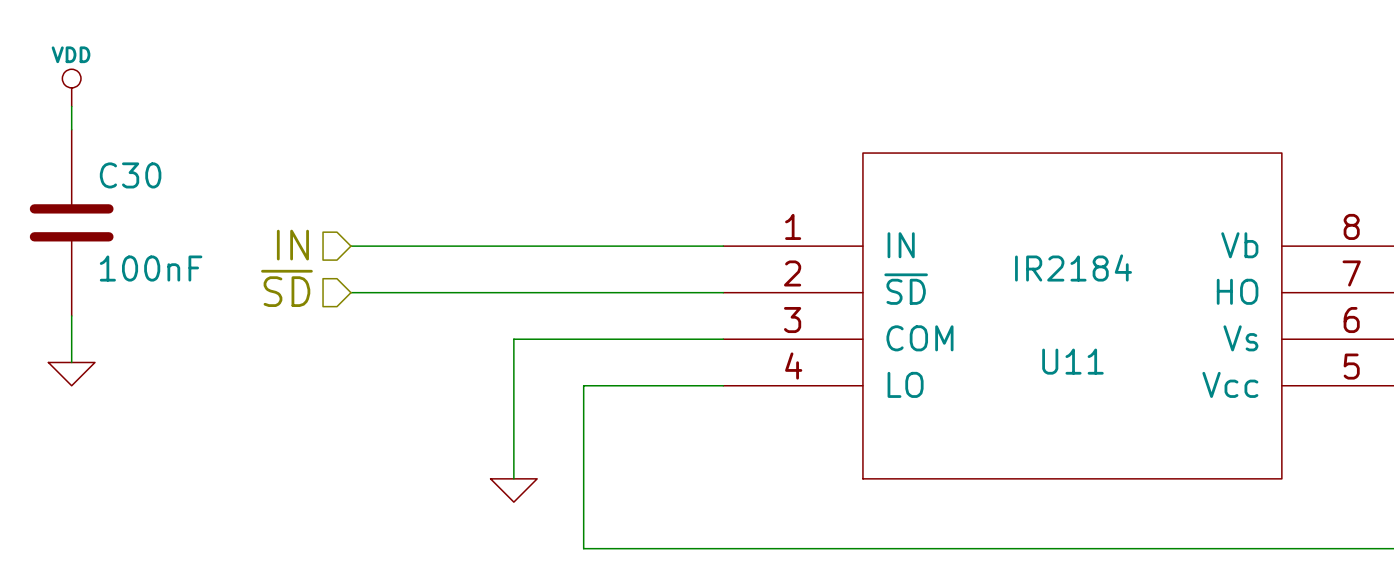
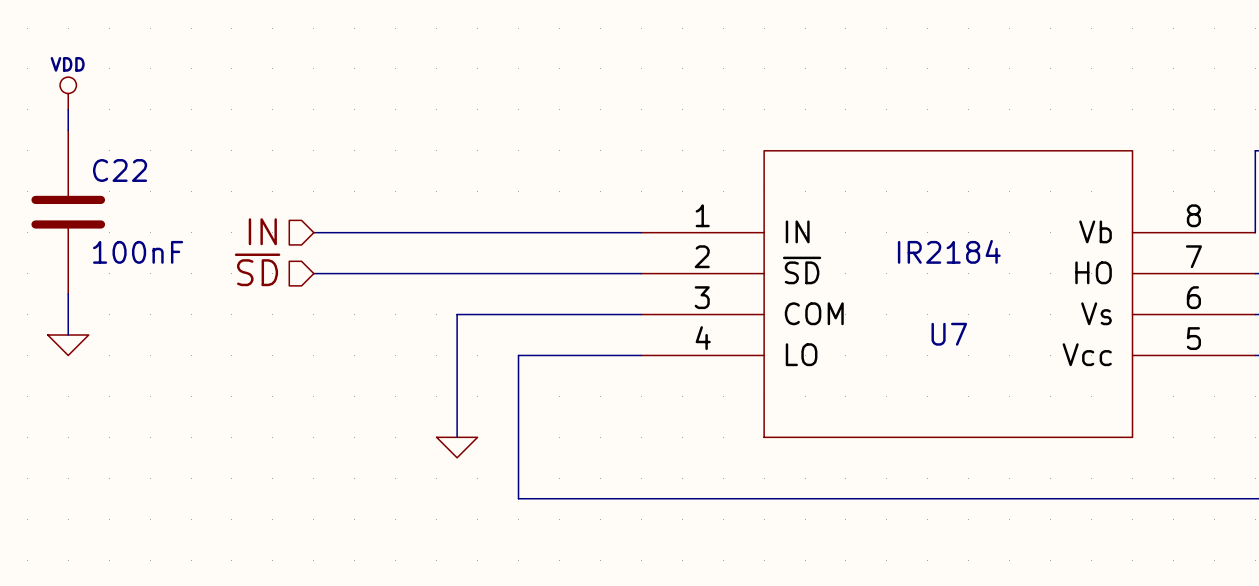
C30 name: C30 (130, 175) -> C22 (120, 170)
U11 name: U11 (1072, 361) -> U7 (949, 334)

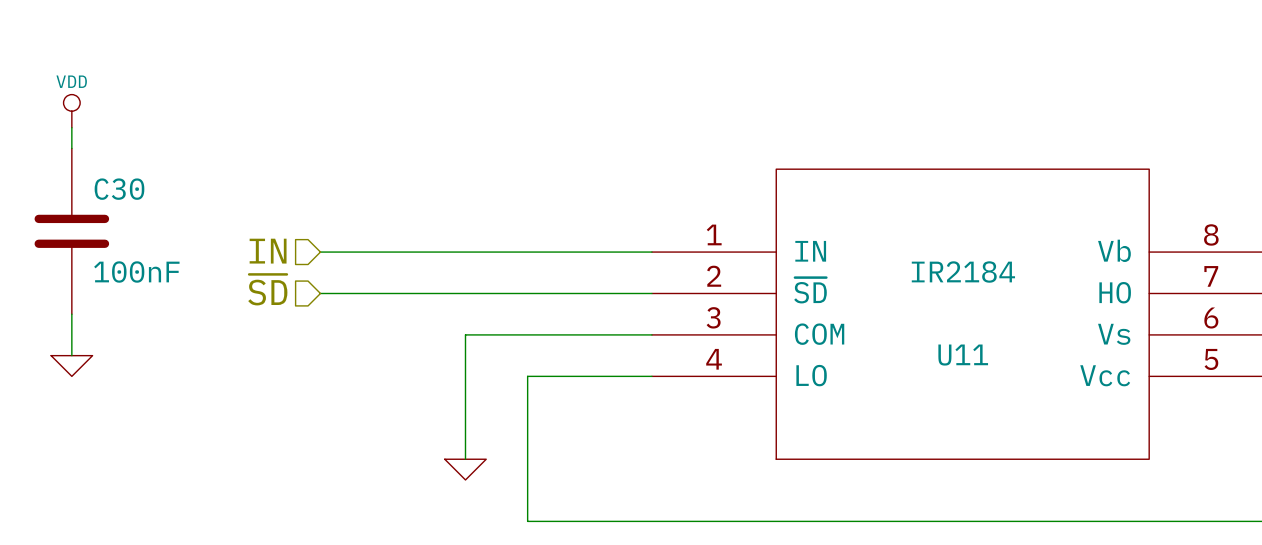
C22 name: C22 (120, 170) -> C30 (119, 189)
U7 name: U7 (949, 334) -> U11 (963, 355)

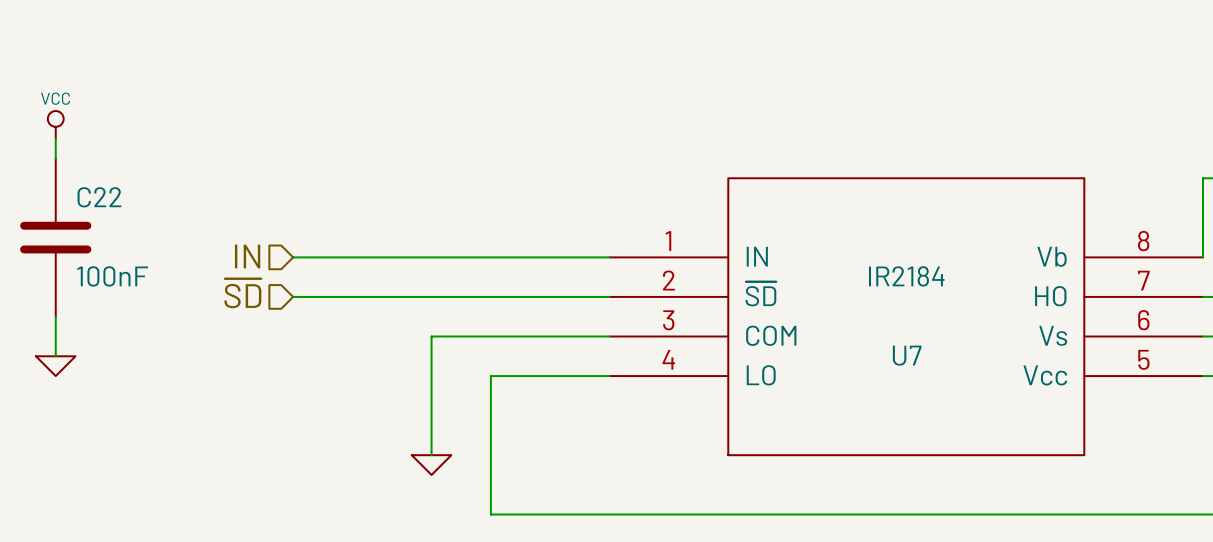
power symbol: VDD (71, 111) -> VCC (55, 124)
C30 name: C30 (119, 189) -> C22 (99, 197)
U11 name: U11 (963, 355) -> U7 (907, 355)

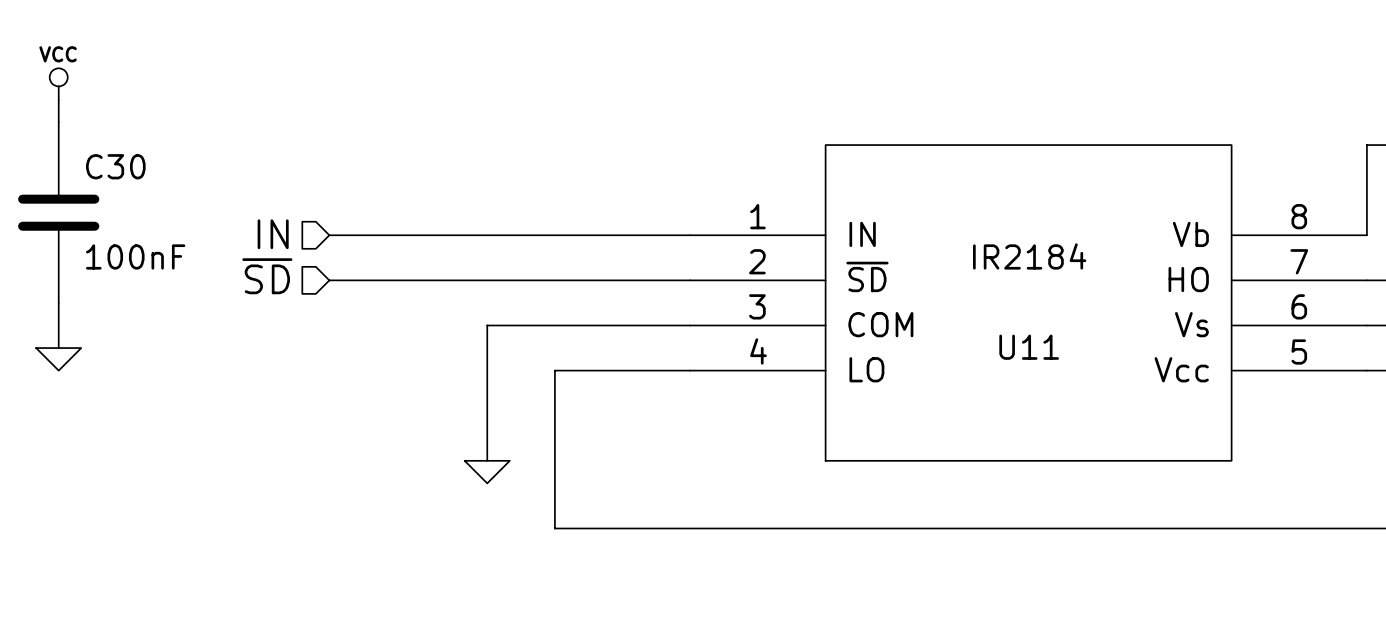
C22 name: C22 (99, 197) -> C30 (115, 166)
U7 name: U7 (907, 355) -> U11 (1029, 347)

